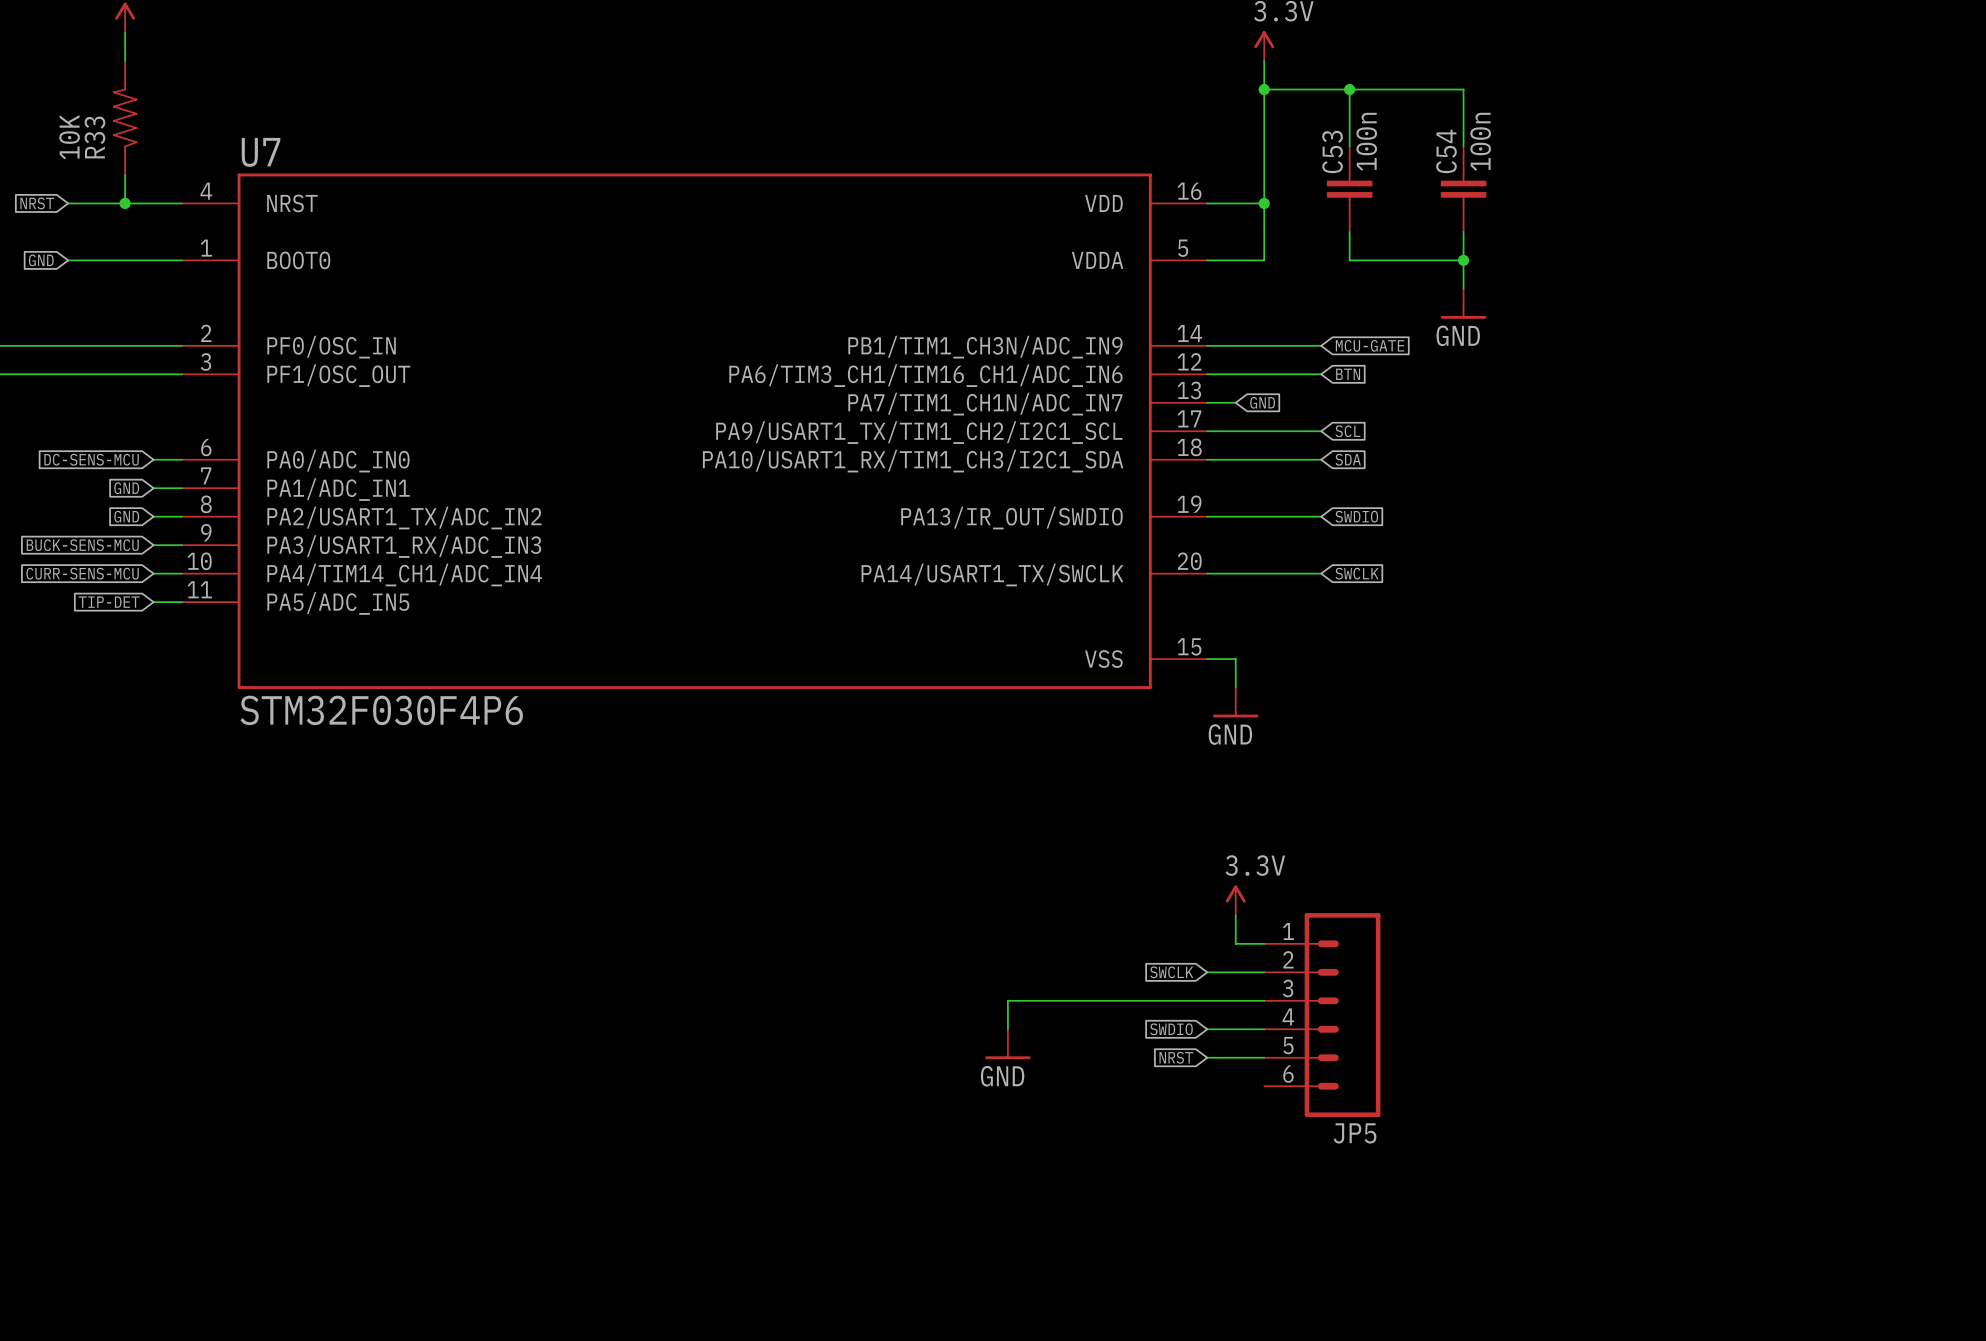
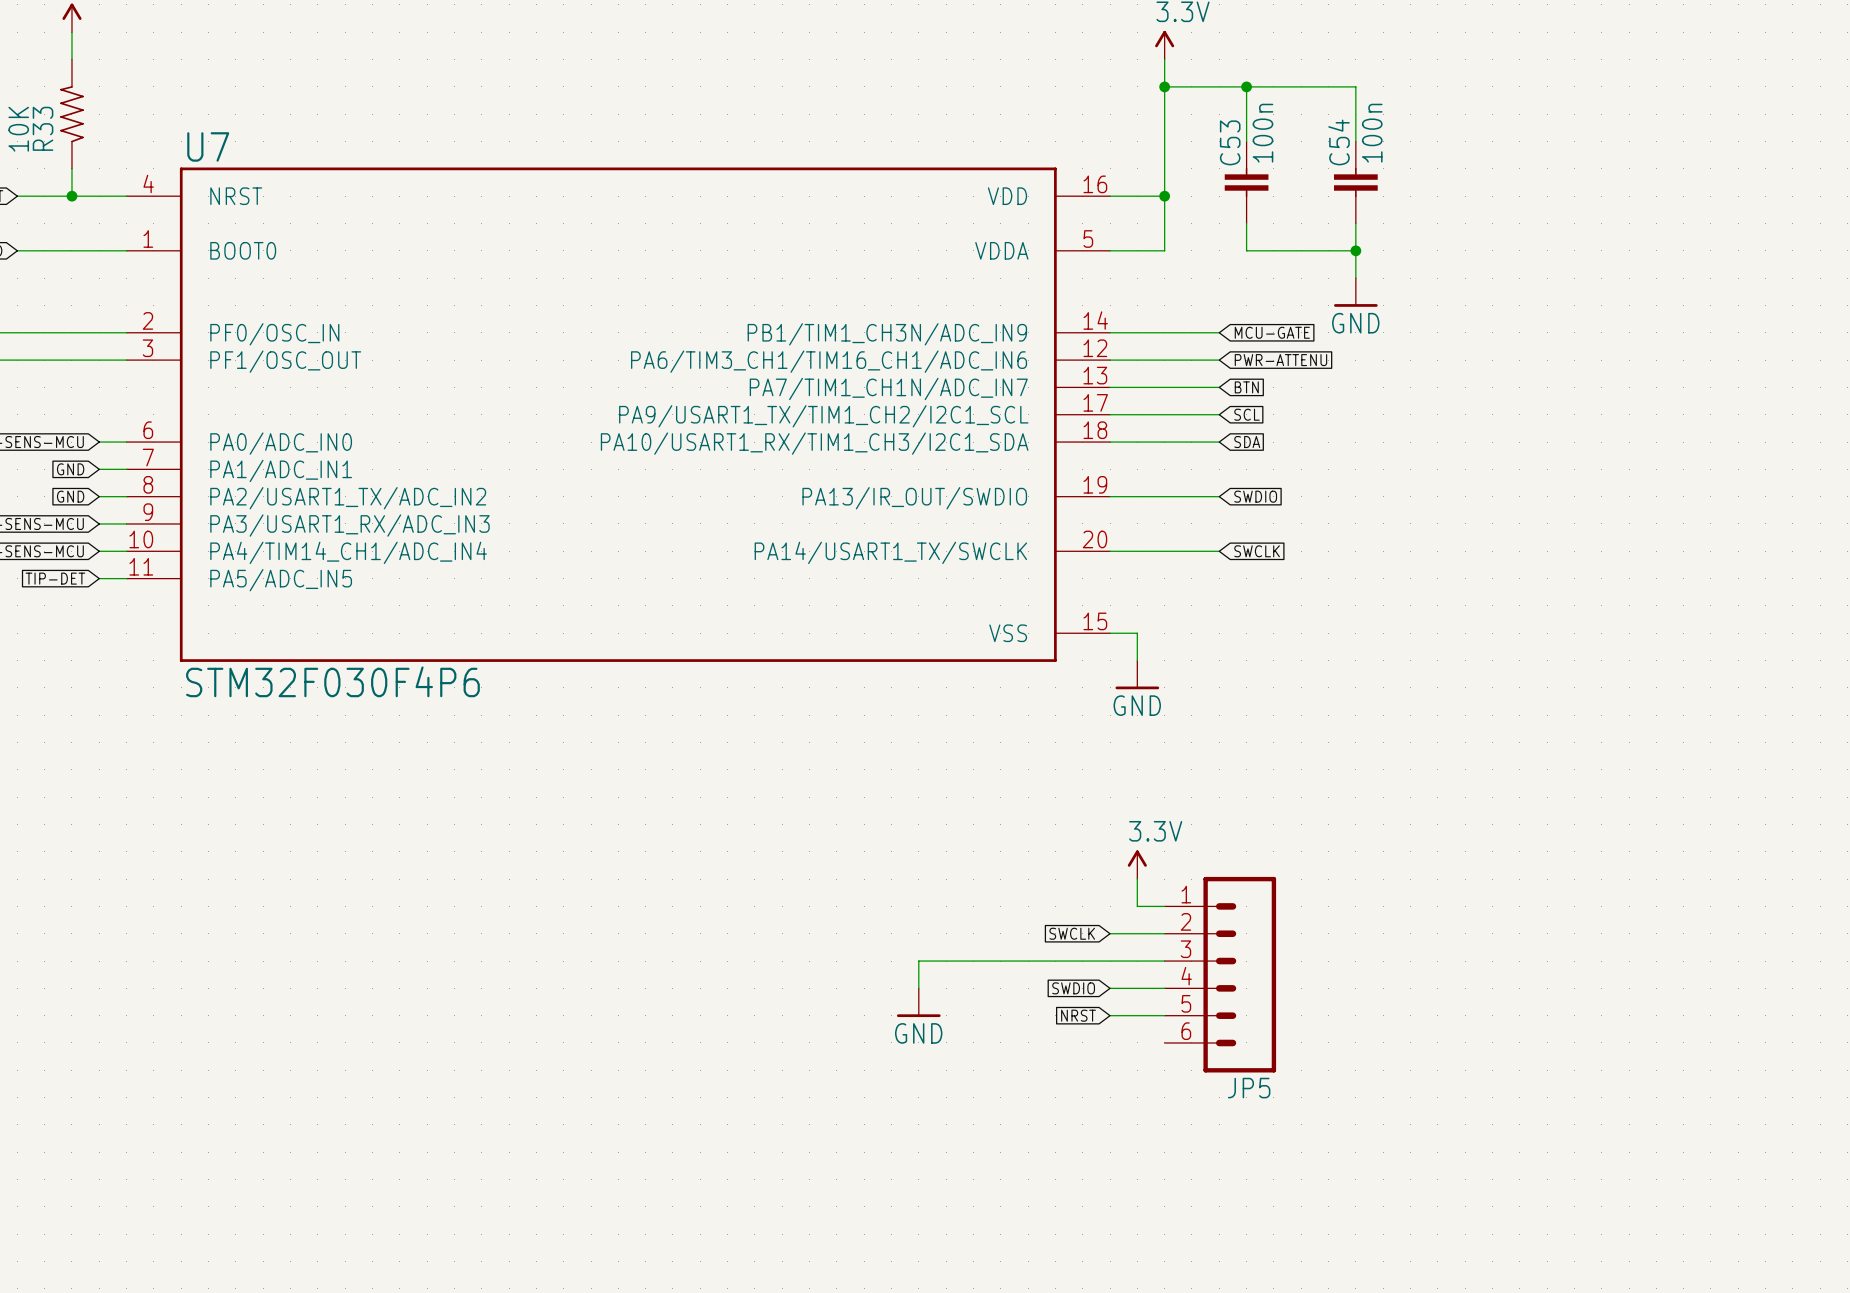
global label: BTN (1348, 374) -> PWR-ATTENU (1280, 360)
wire: none -> (1137, 387) (1219, 387)
global label: GND (1262, 402) -> none
global label: none -> BTN (1246, 387)

